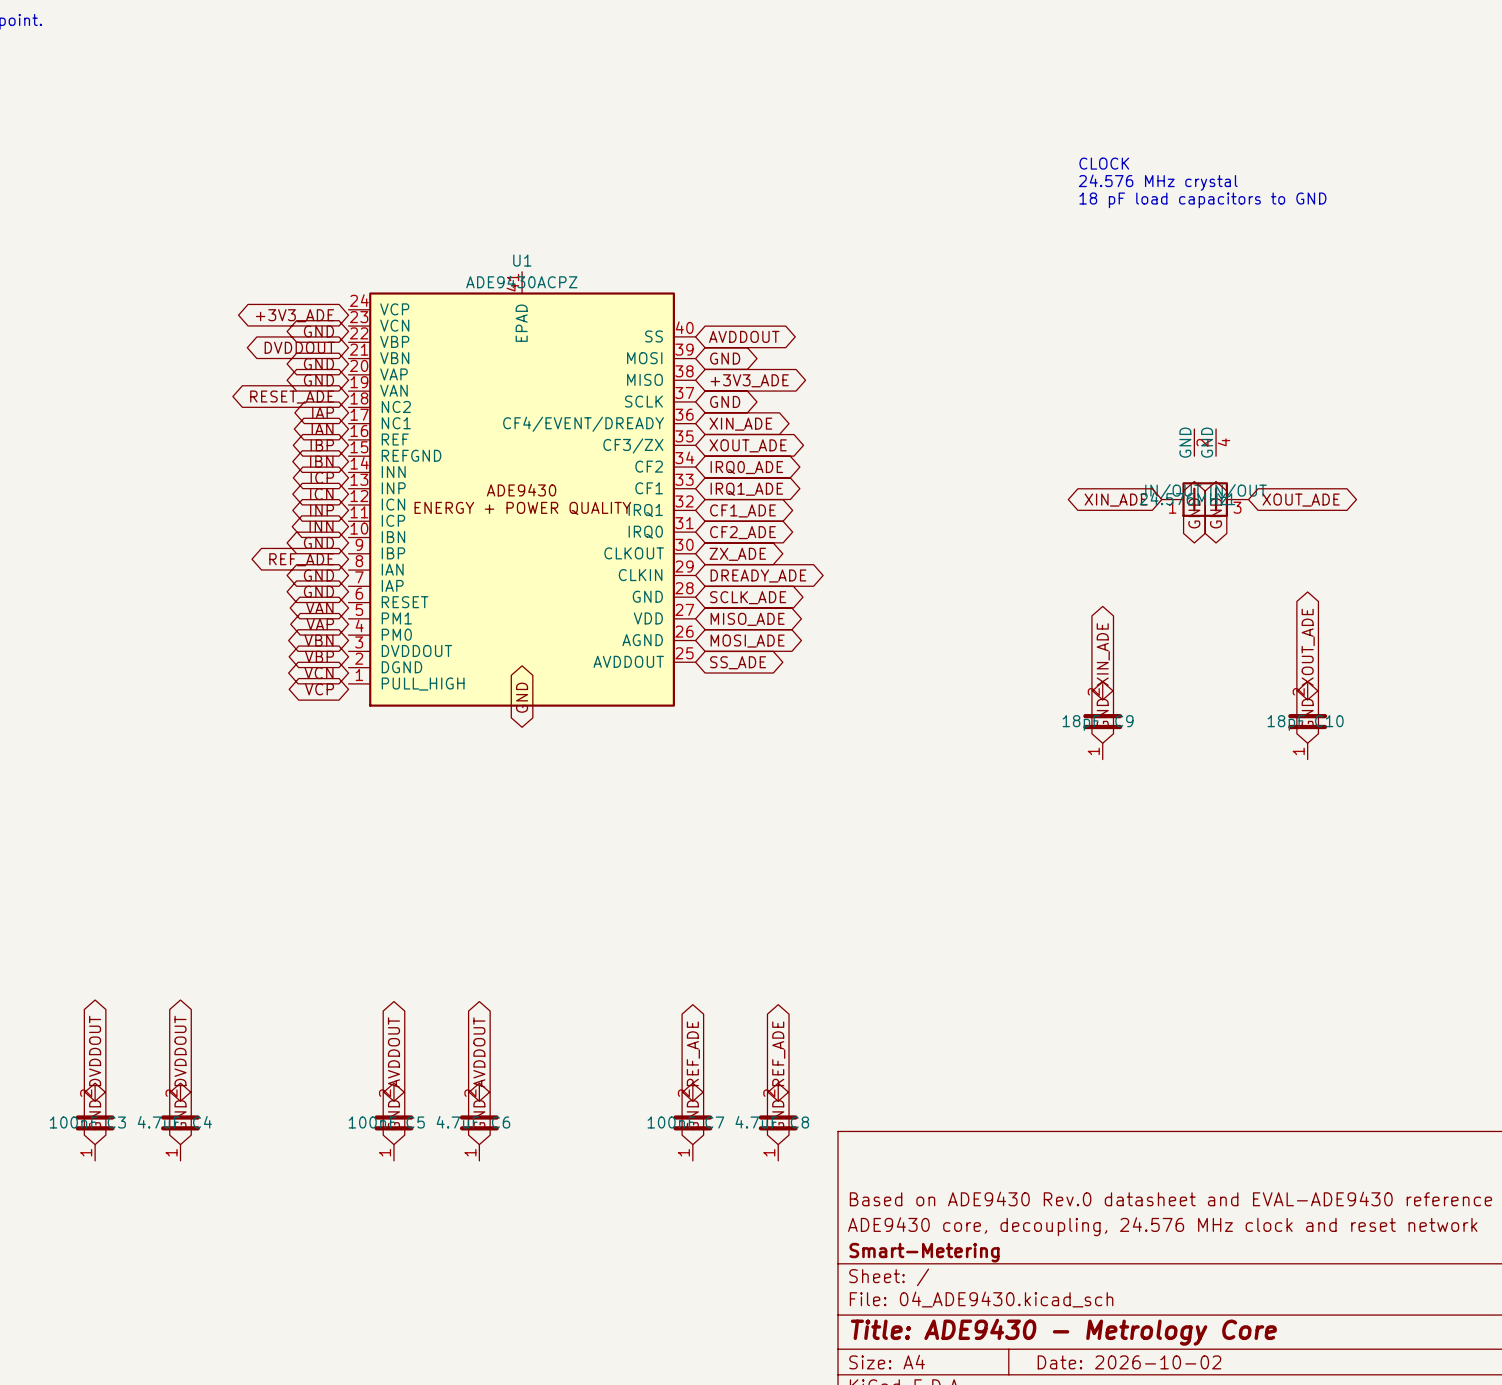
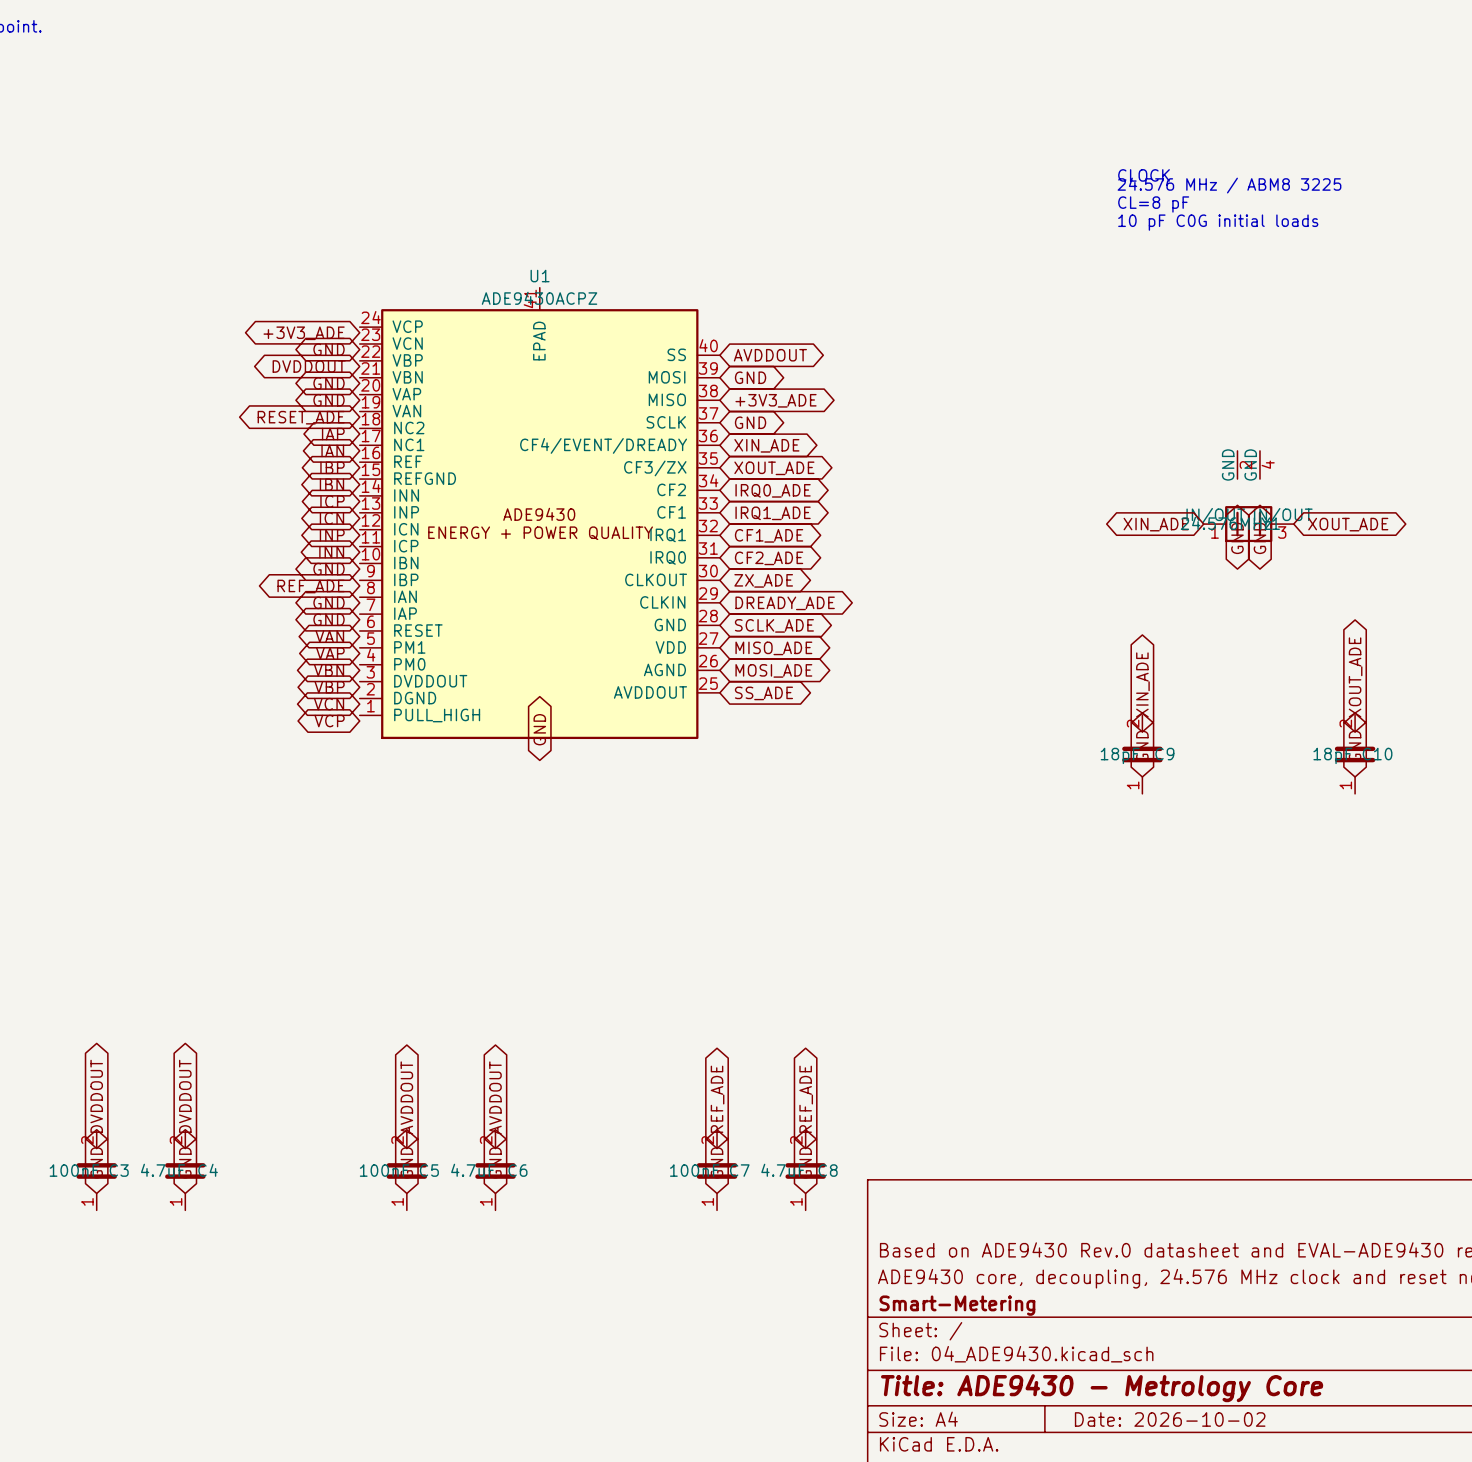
text: none -> 24.576 MHz / ABM8 3225 (1229, 185)
text: 24.576 MHz crystal (1158, 182) -> none
text: none -> CL=8 pF (1153, 204)
text: 18 pF load capacitors to GND (1202, 200) -> none
text: none -> 10 pF C0G initial loads (1218, 222)

